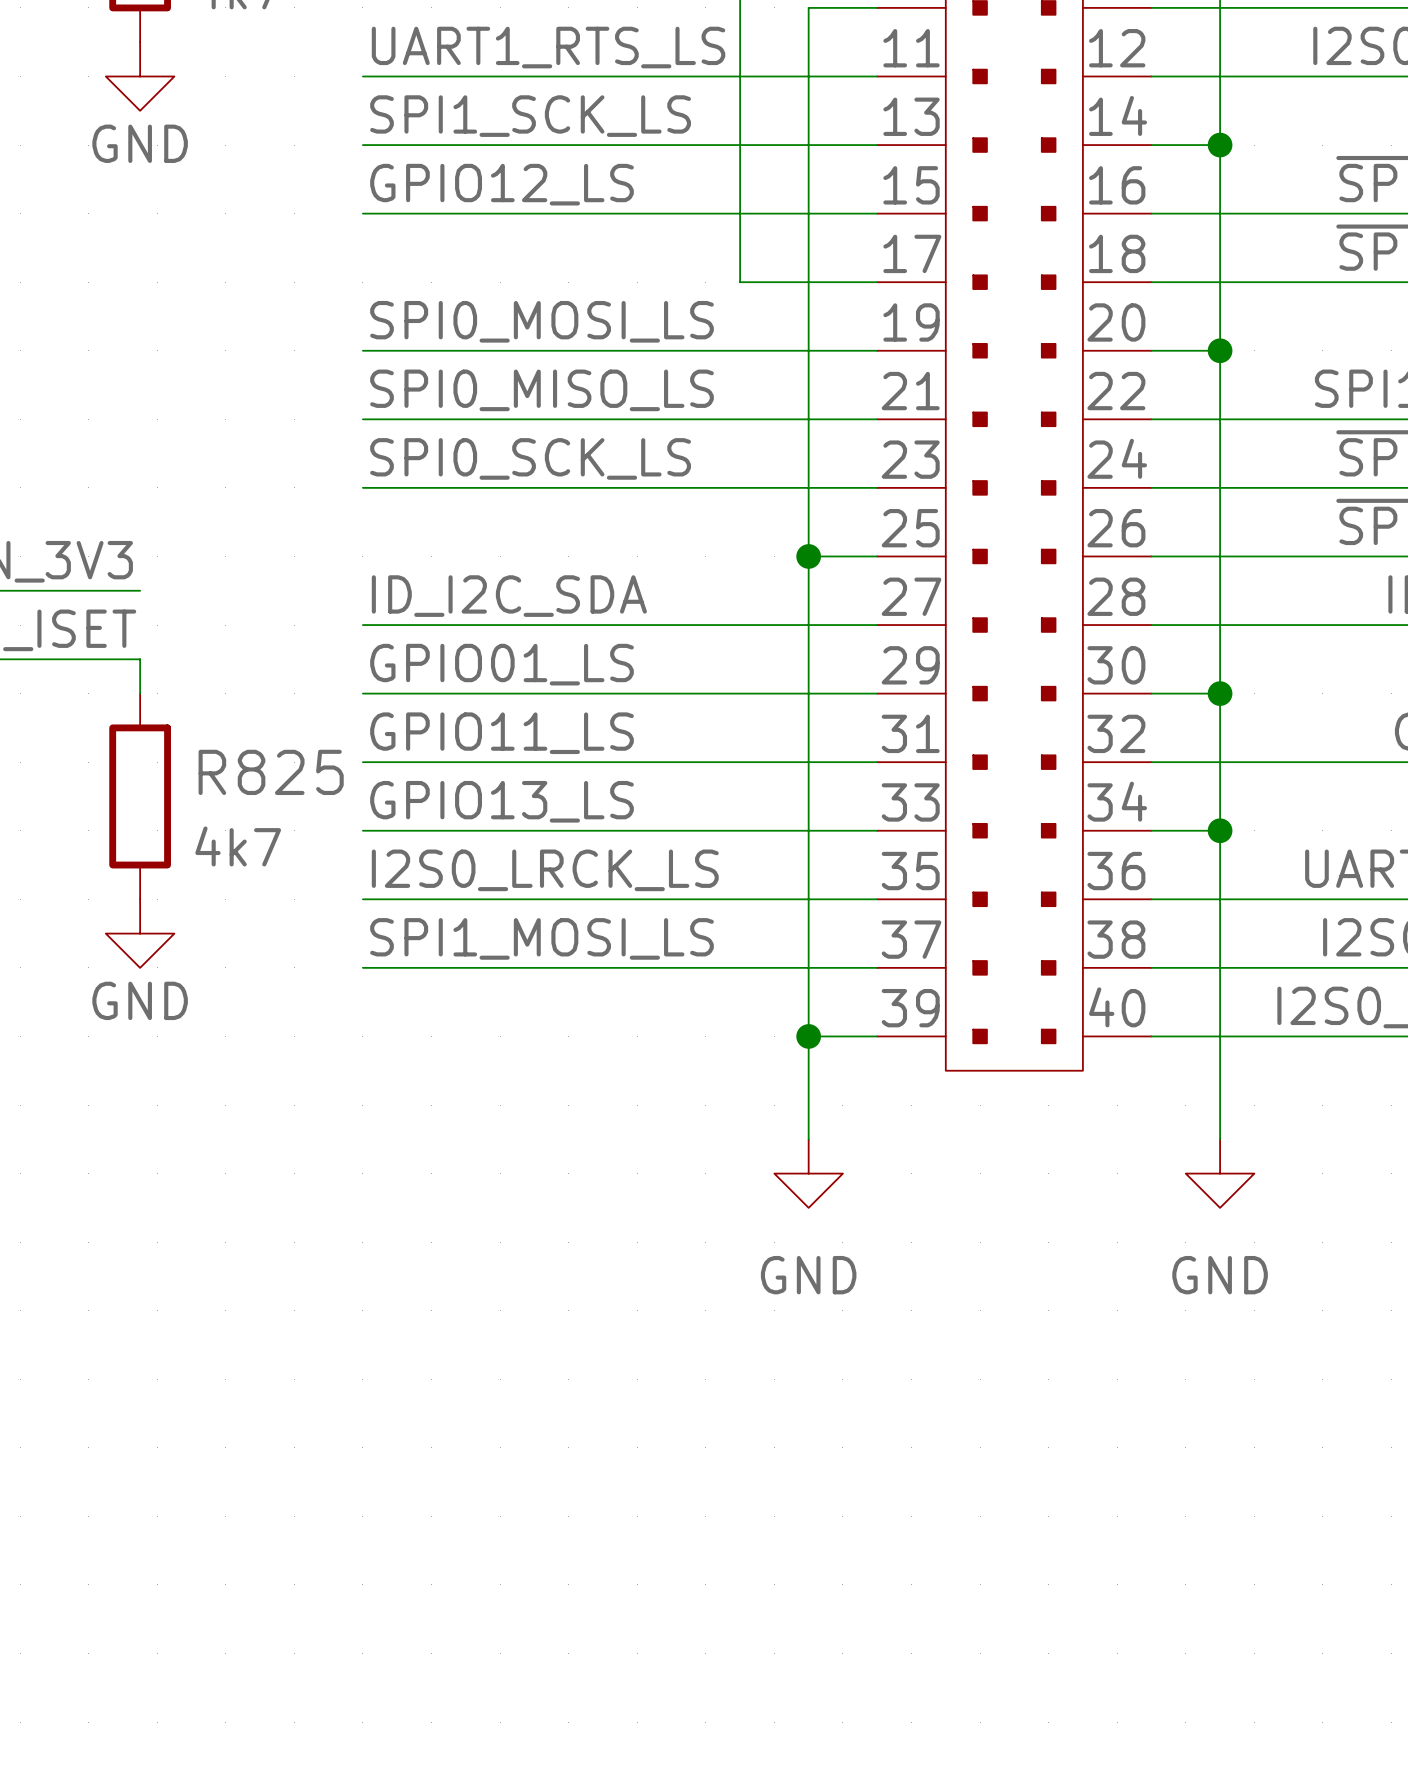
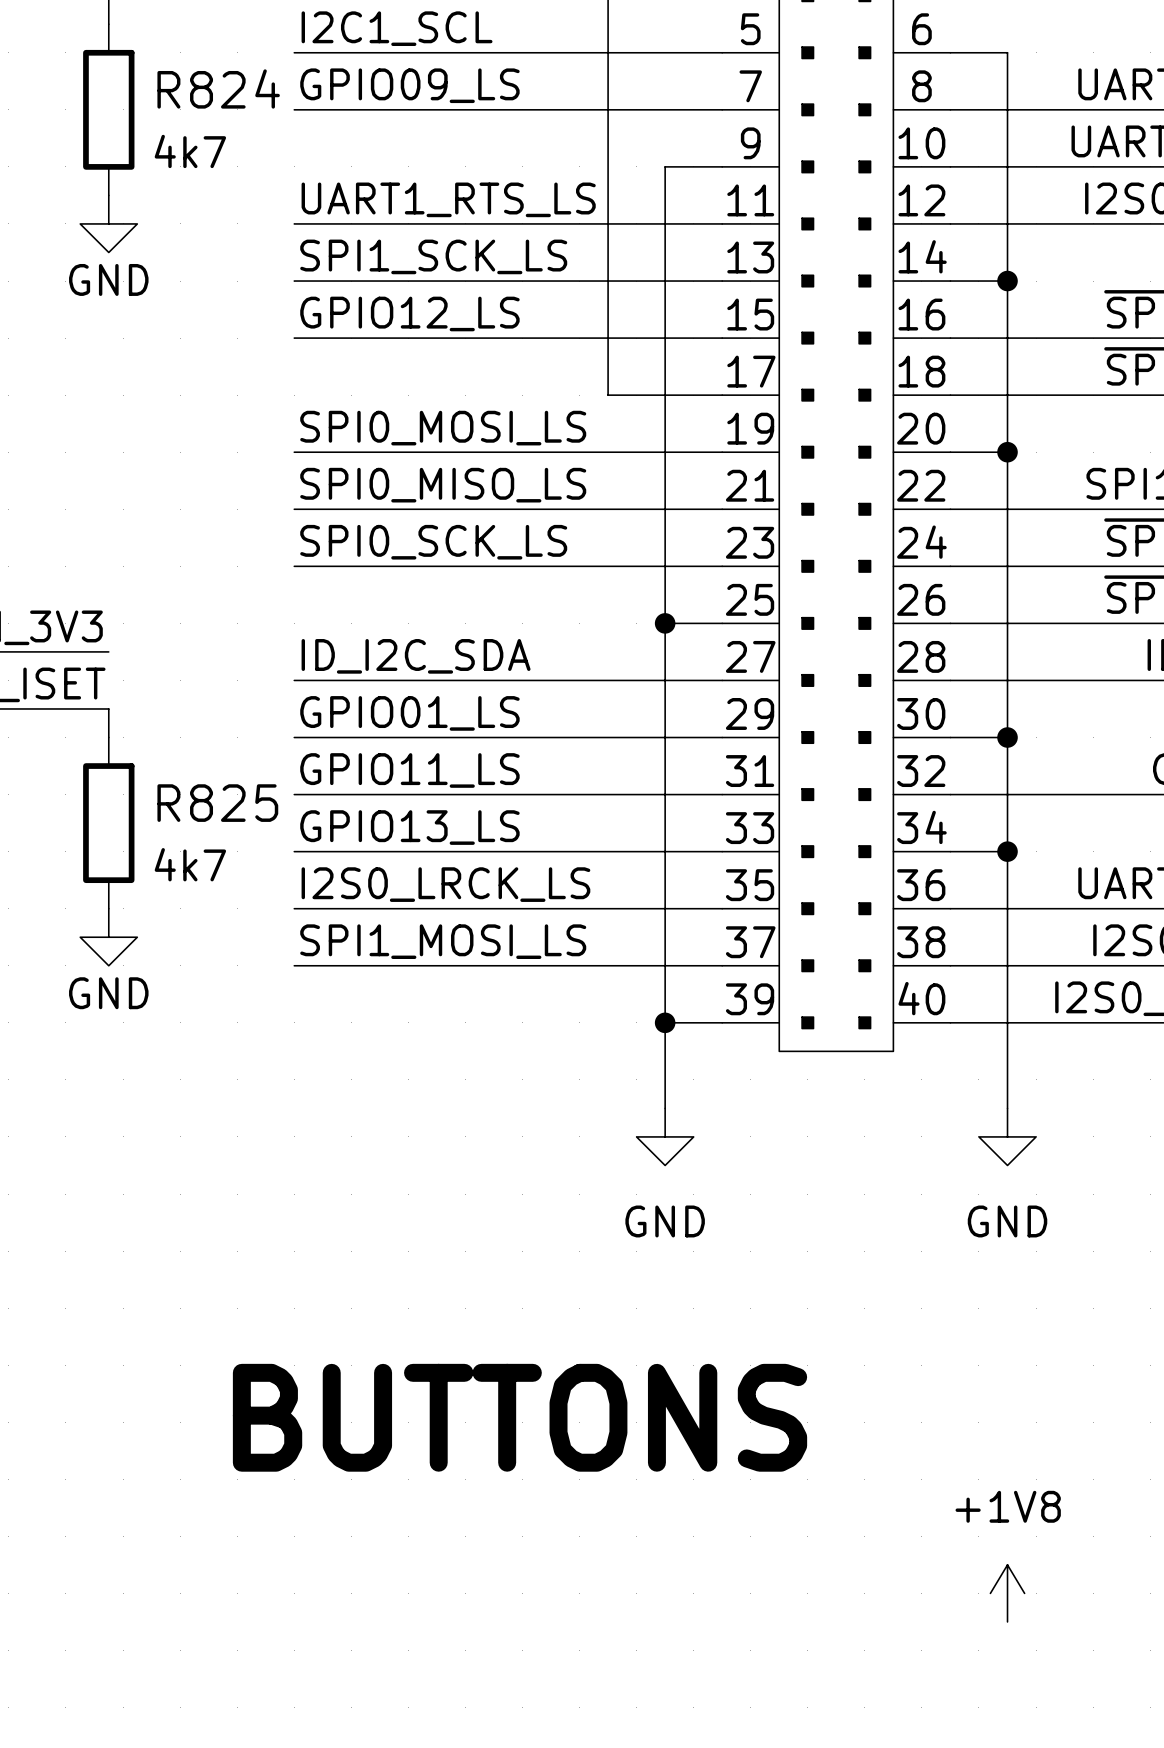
text: none -> BUTTONS (520, 1417)
power symbol: none -> +1V8 (1007, 1593)

